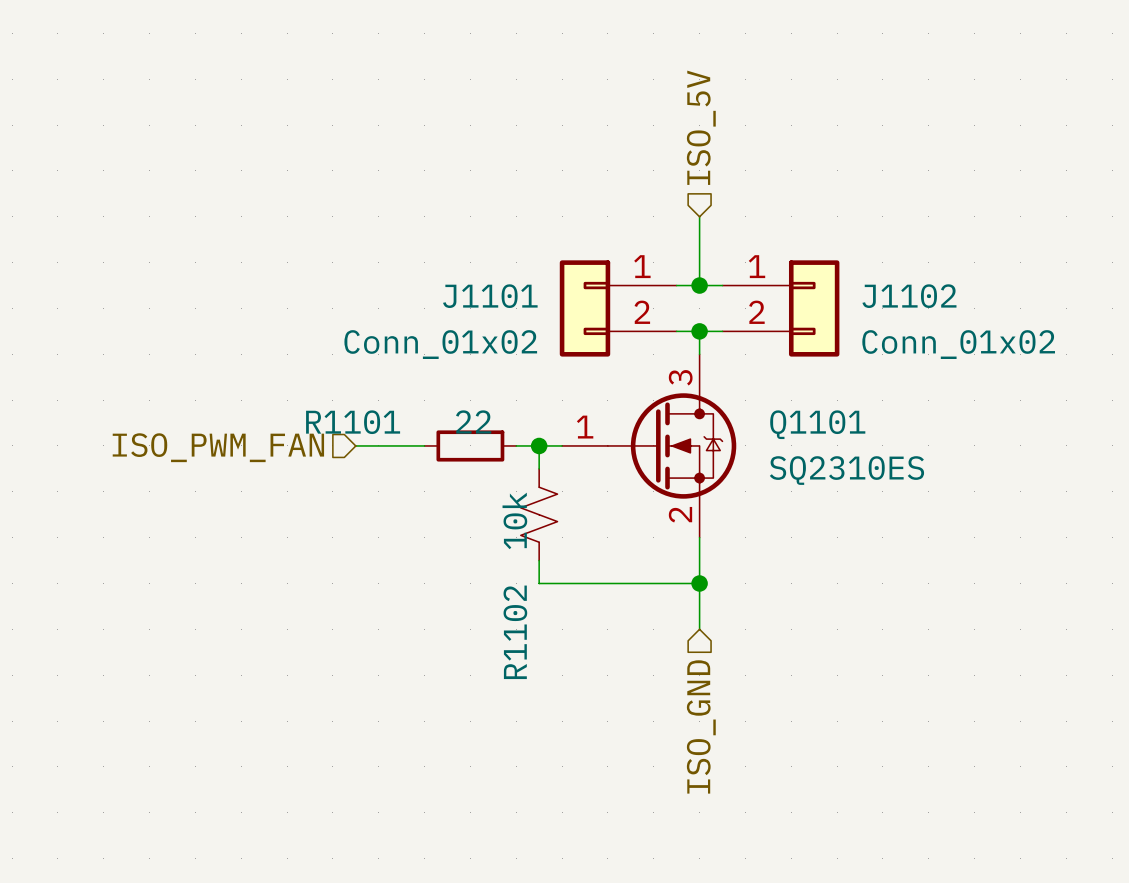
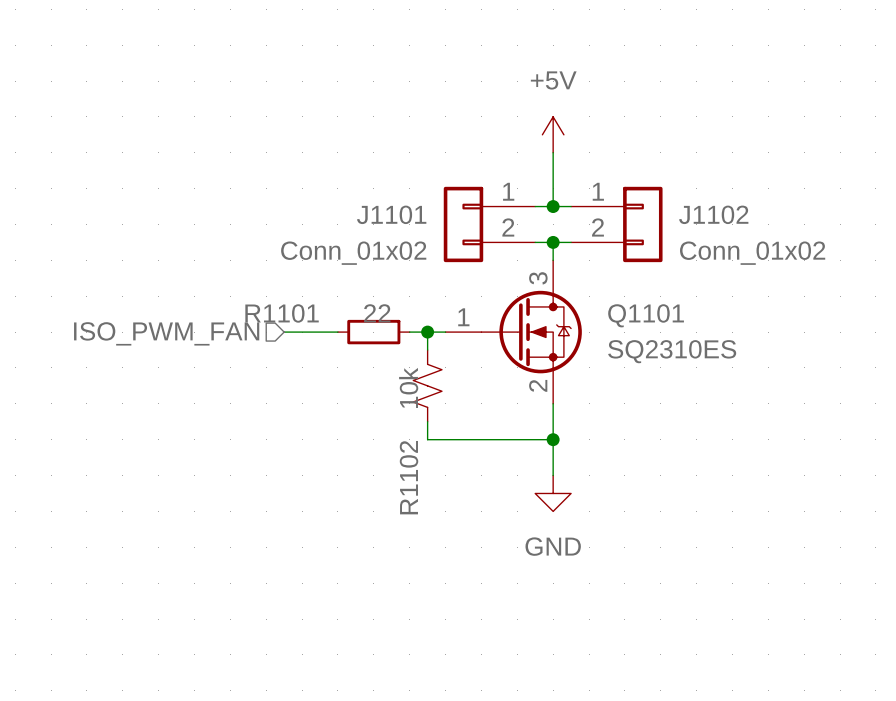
hierarchical label: ISO_5V (701, 127) -> none
power symbol: none -> +5V (553, 134)
power symbol: none -> GND (553, 493)
hierarchical label: ISO_GND (701, 726) -> none

